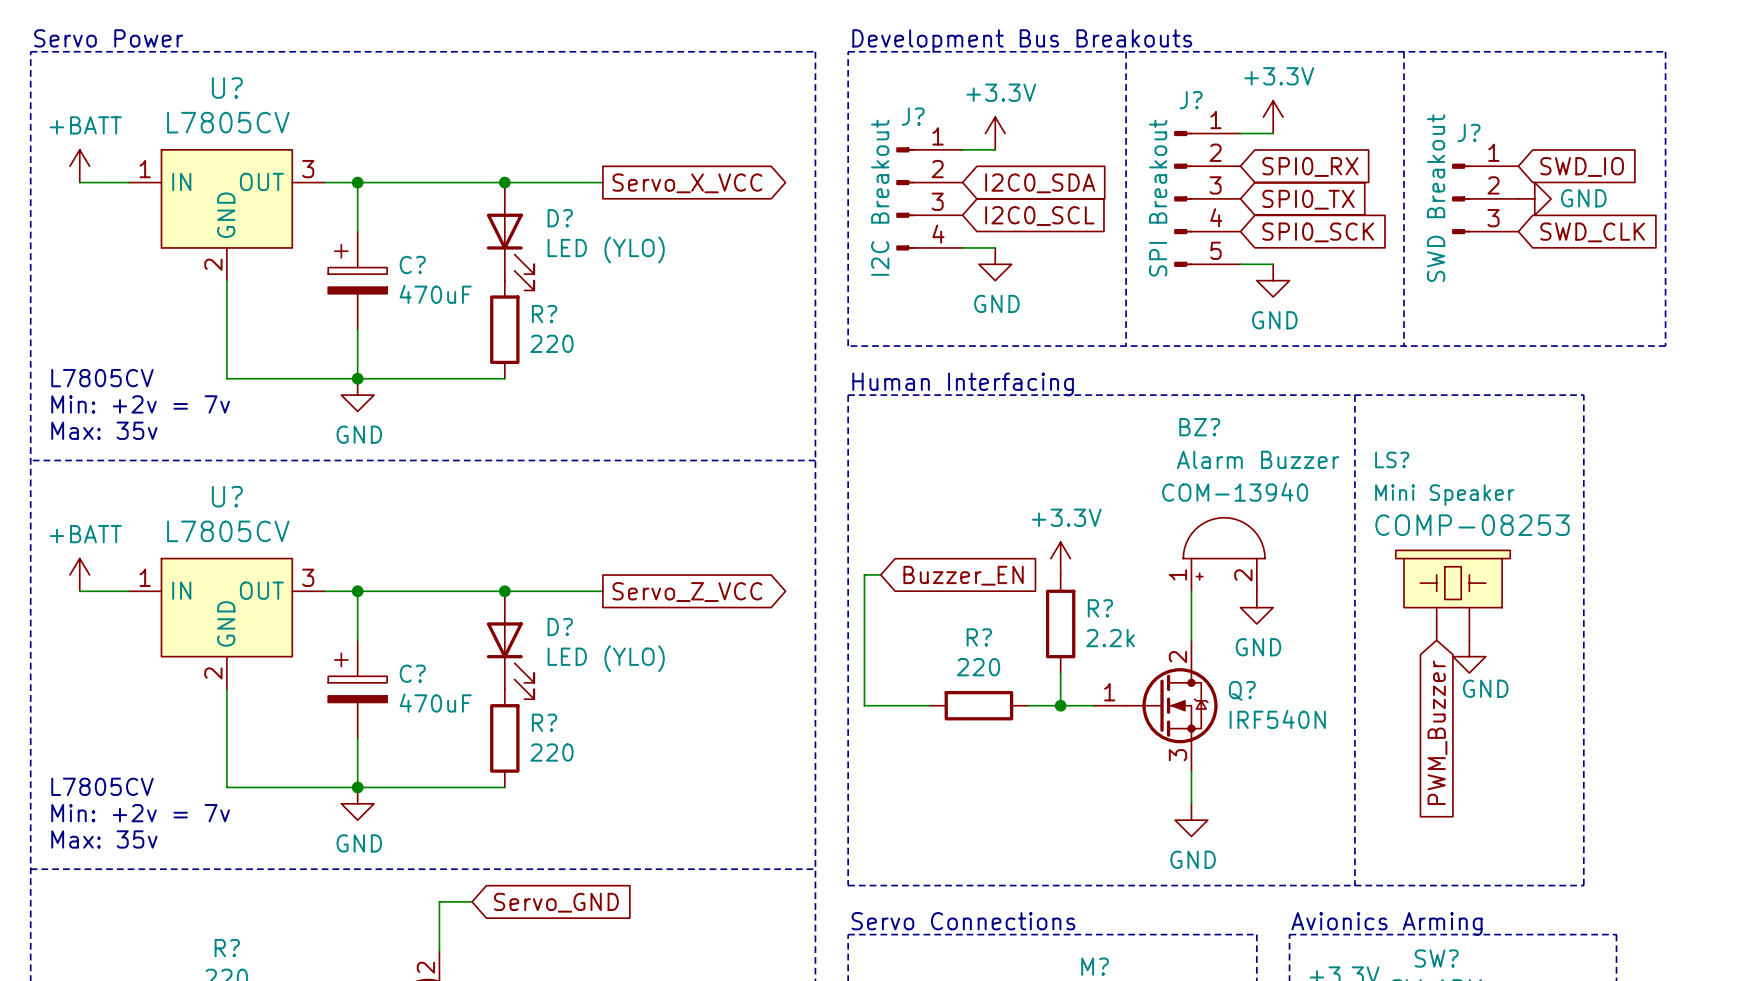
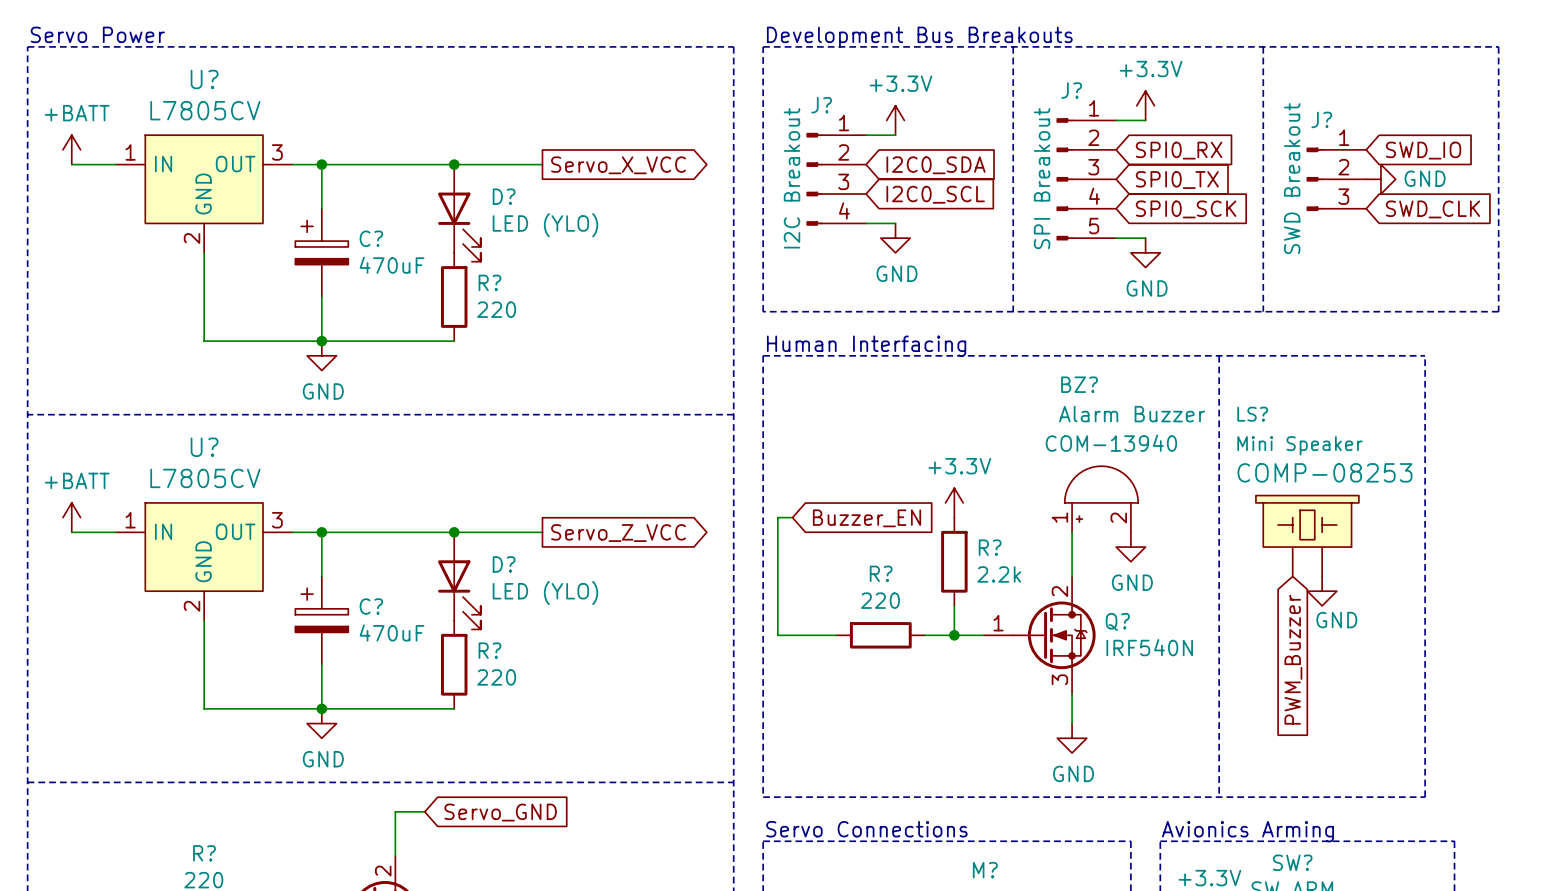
text: L7805CV (102, 378) -> none
text: Min: +2v = 7v (140, 404) -> none
text: Max: 35v (104, 430) -> none
text: L7805CV (102, 786) -> none
text: Min: +2v = 7v (140, 813) -> none
text: Max: 35v (104, 839) -> none

